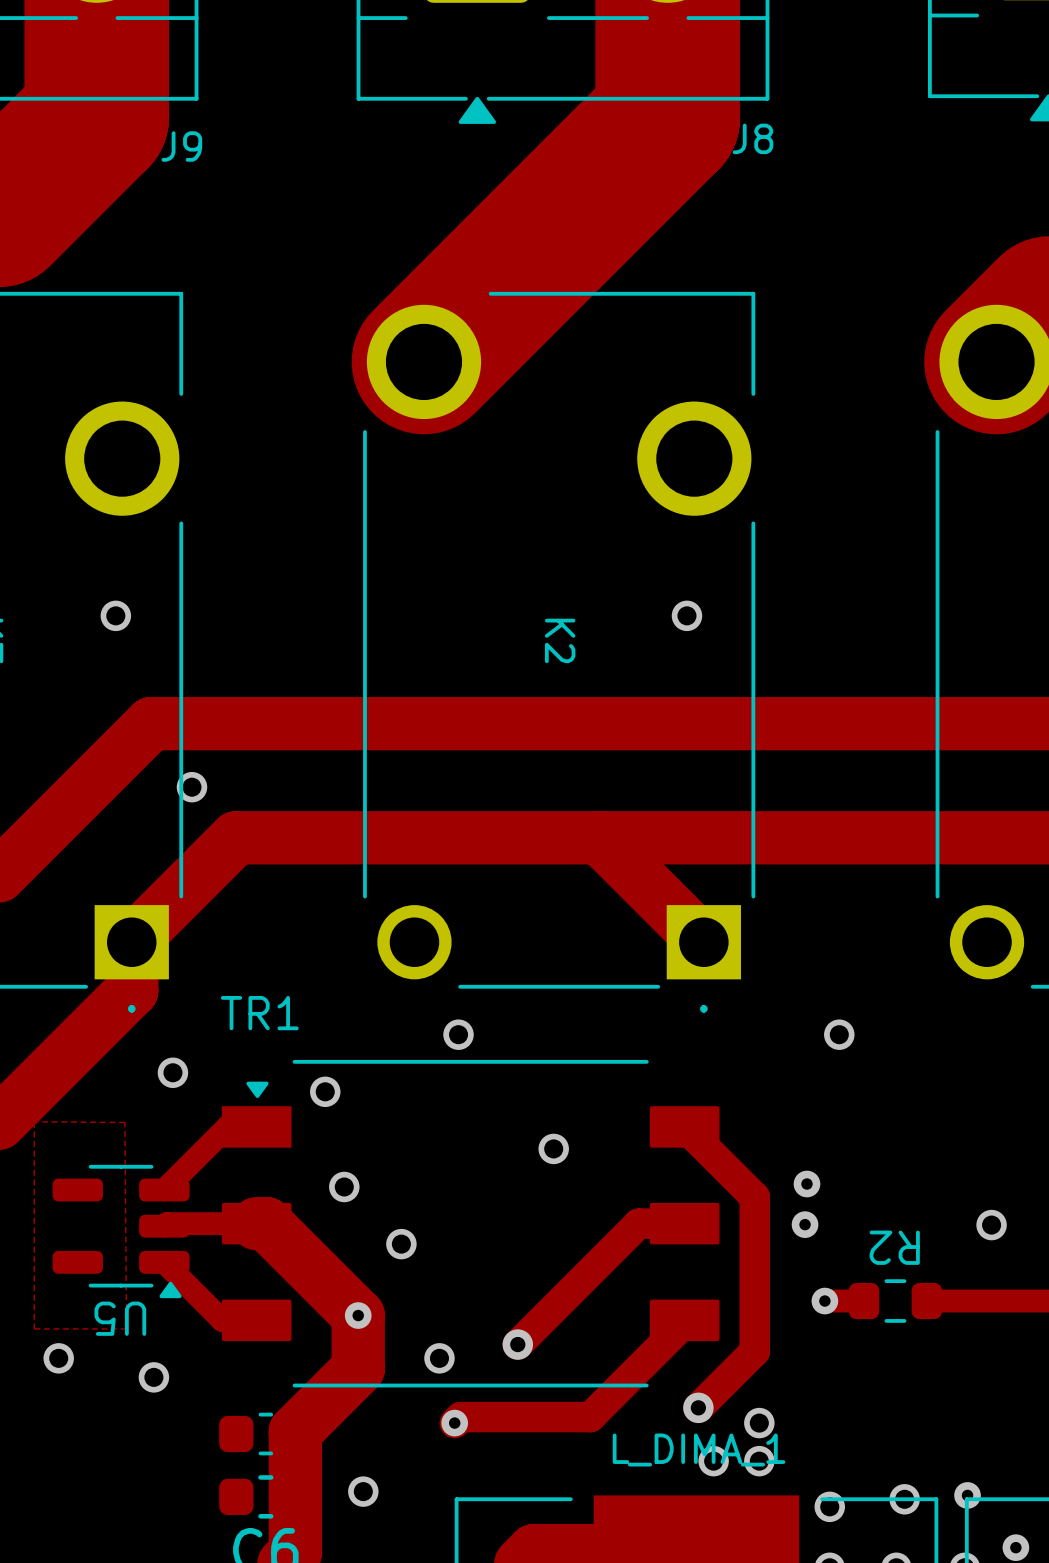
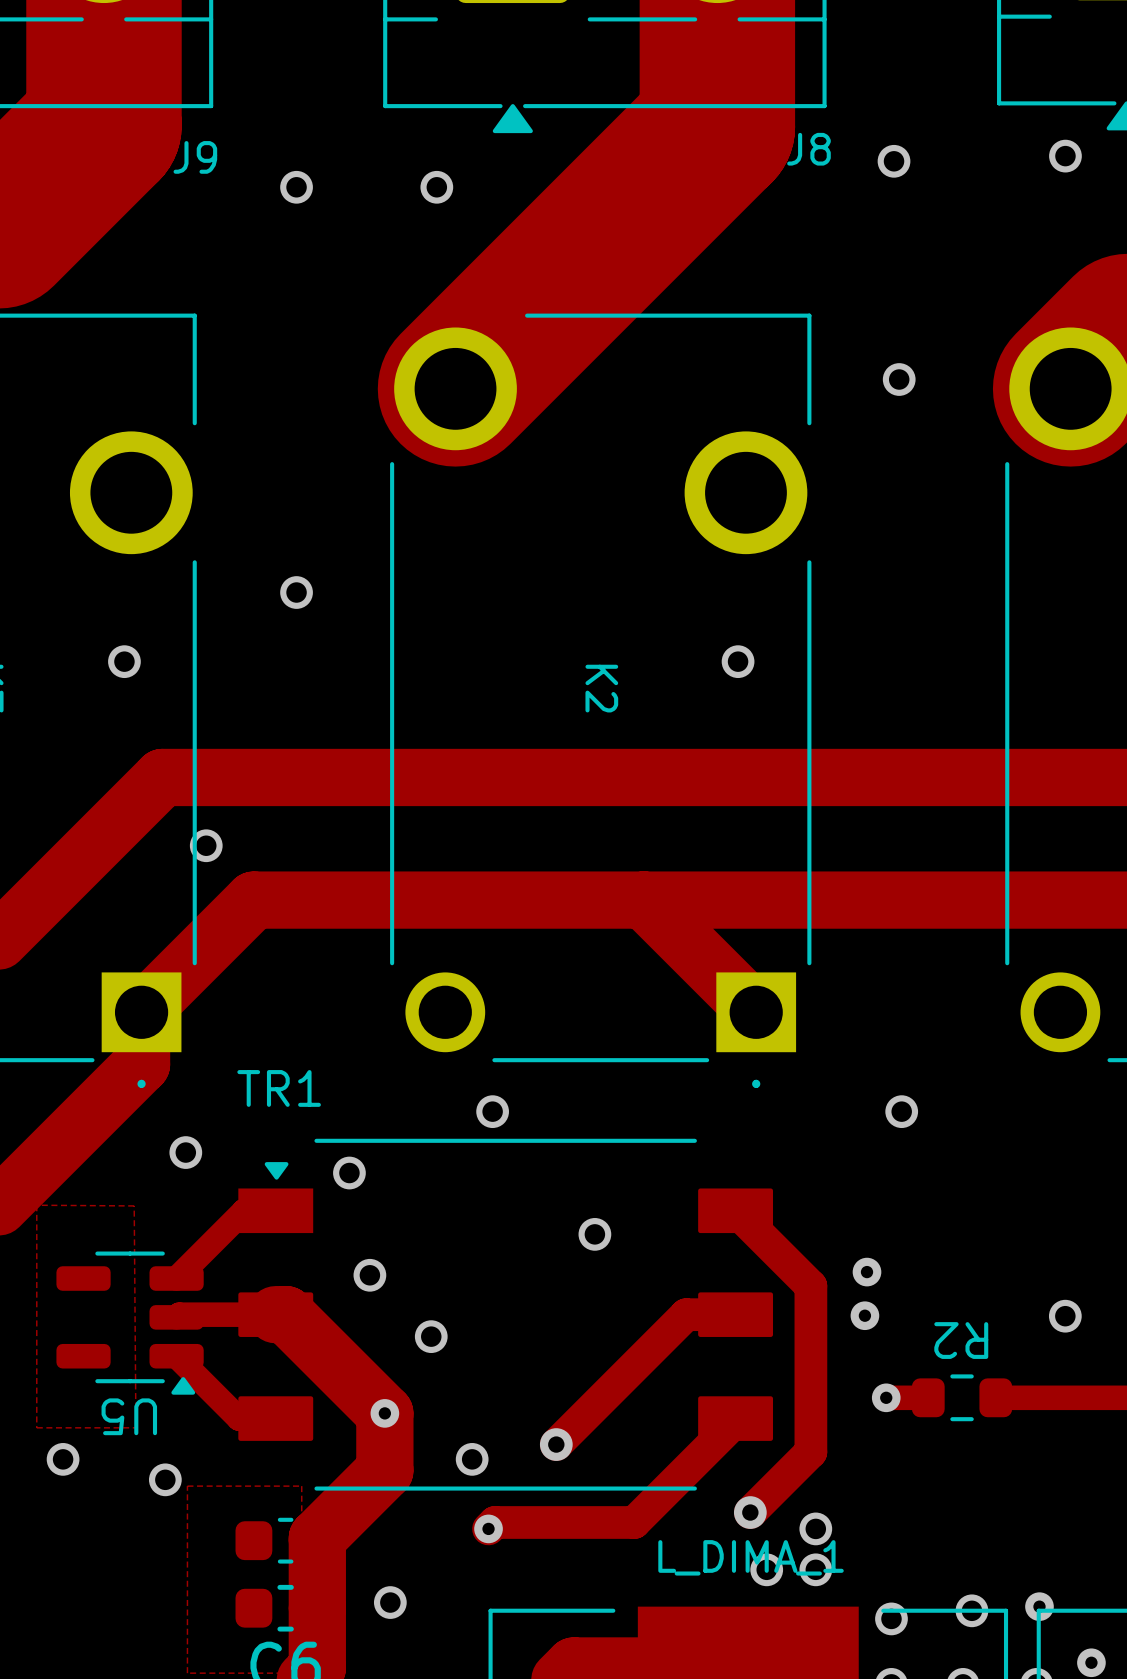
via: none -> (1065, 156)
via: none -> (894, 161)
via: none -> (296, 187)
via: none -> (436, 187)
via: none -> (899, 379)
via: none -> (296, 592)
zone outline: none -> (187, 1486) (301, 1486) (301, 1673) (187, 1673) (187, 1486)

